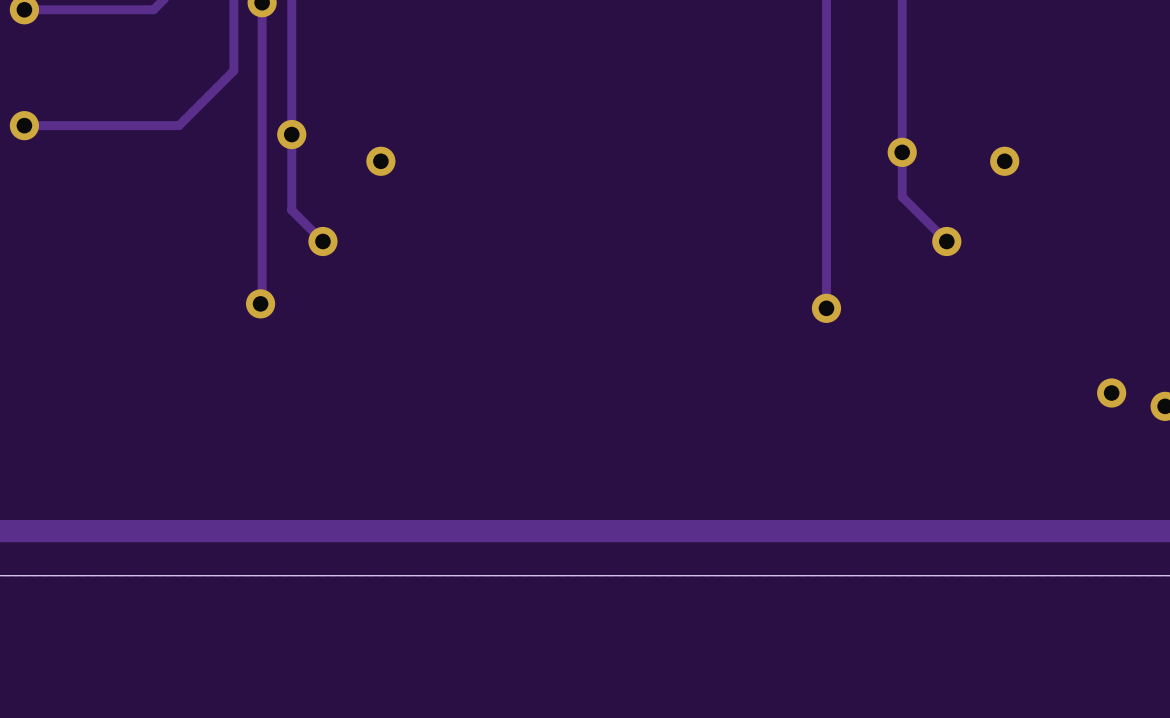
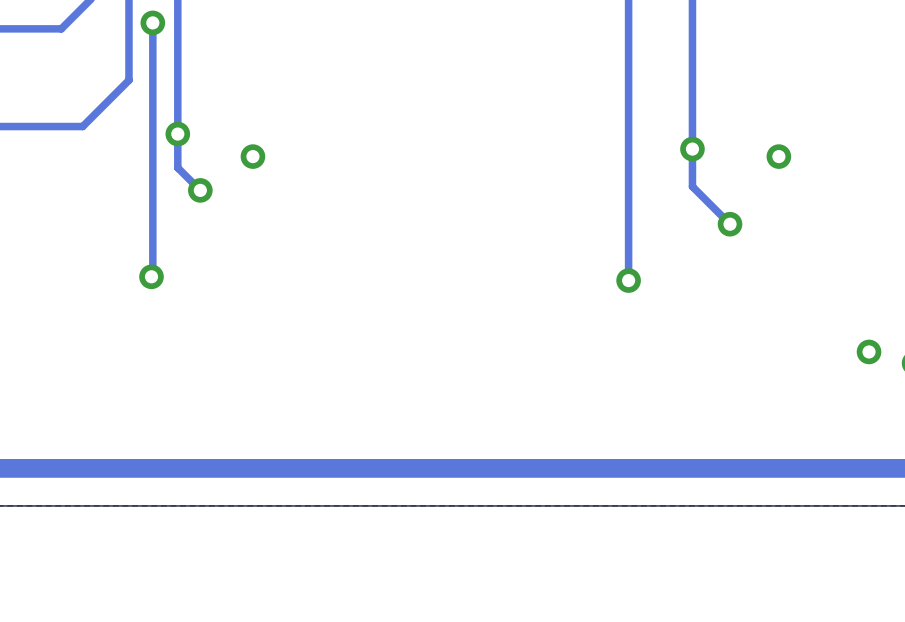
track: (291, 174) (291, 210) (322, 241) -> (177, 167) (200, 190)
via position: (322, 241) -> (200, 190)

